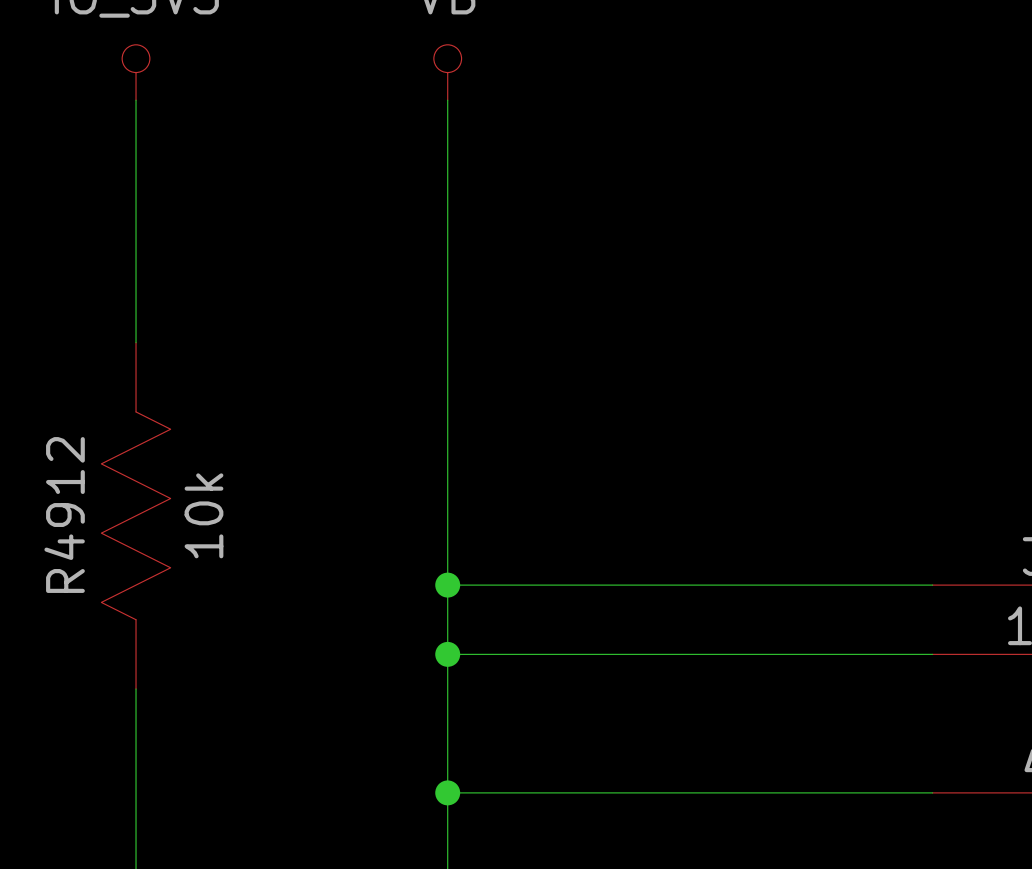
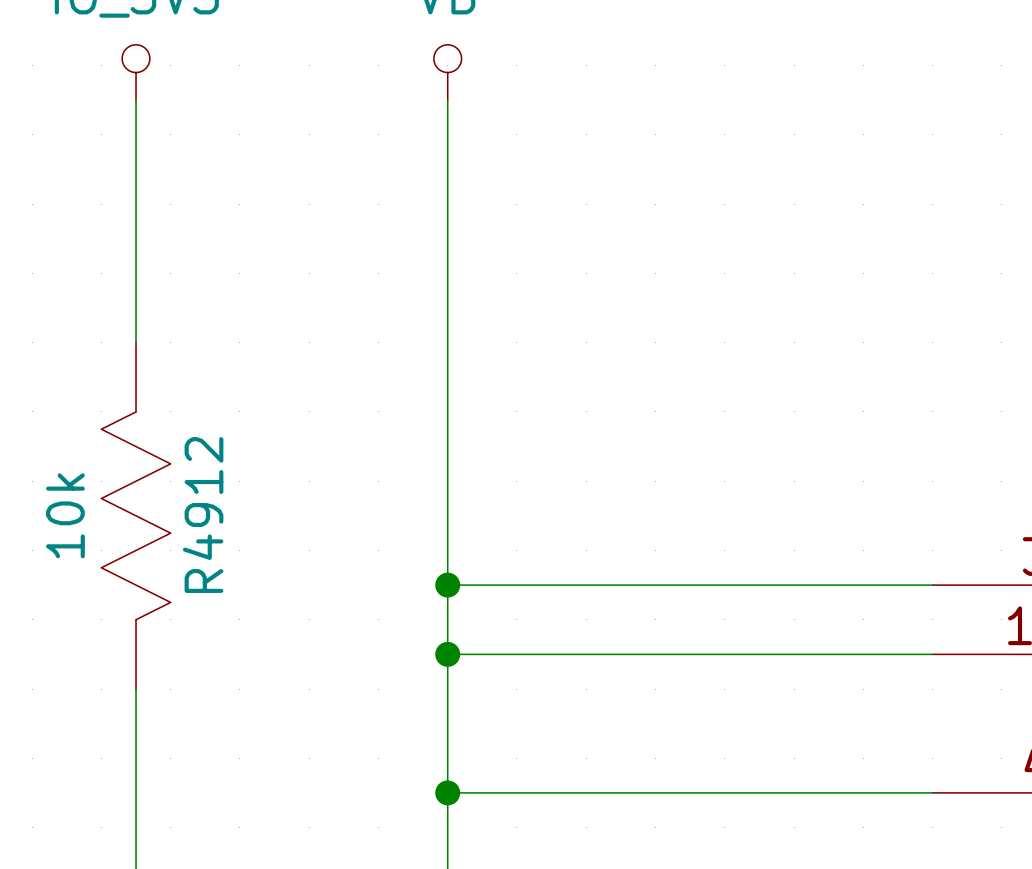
R4912 flip: as is (136, 515) -> left-right (136, 515)

